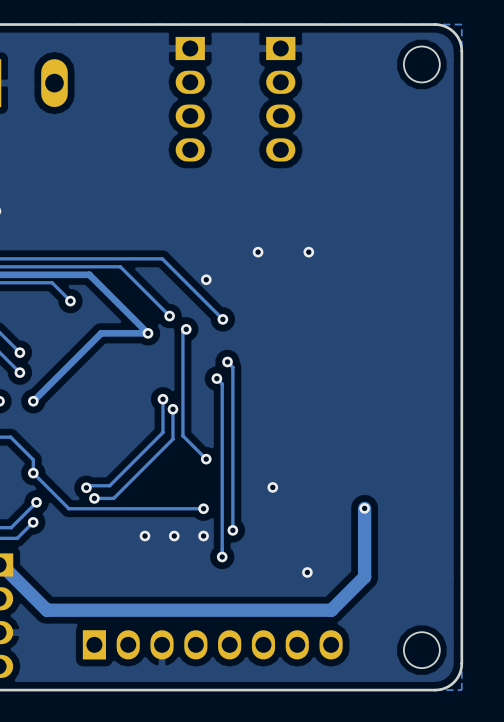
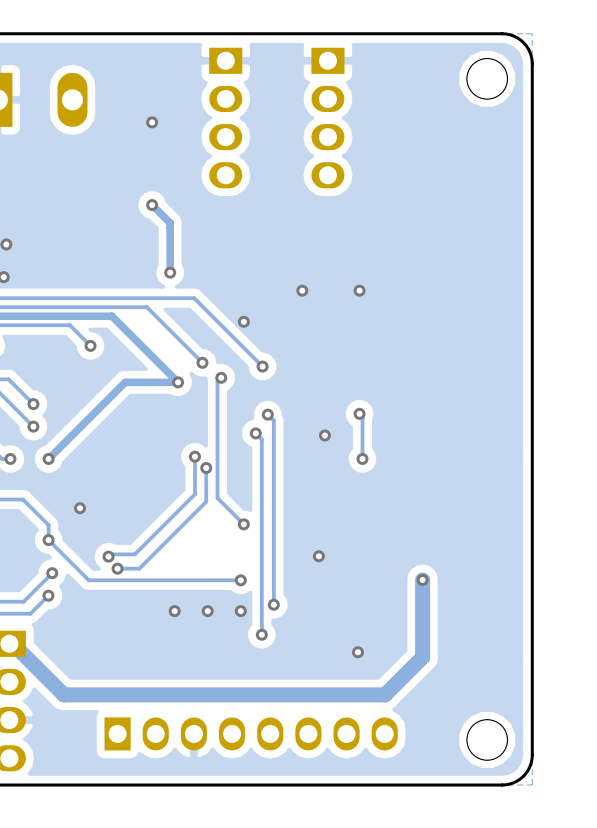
via: none -> (152, 122)
track: none -> (152, 205) (170, 223) (170, 272)
via: none -> (152, 205)
via: none -> (170, 272)
track: none -> (359, 413) (362, 416) (362, 458)
via: none -> (359, 413)
via: none -> (324, 435)
via: none -> (362, 458)
via: none -> (80, 508)

